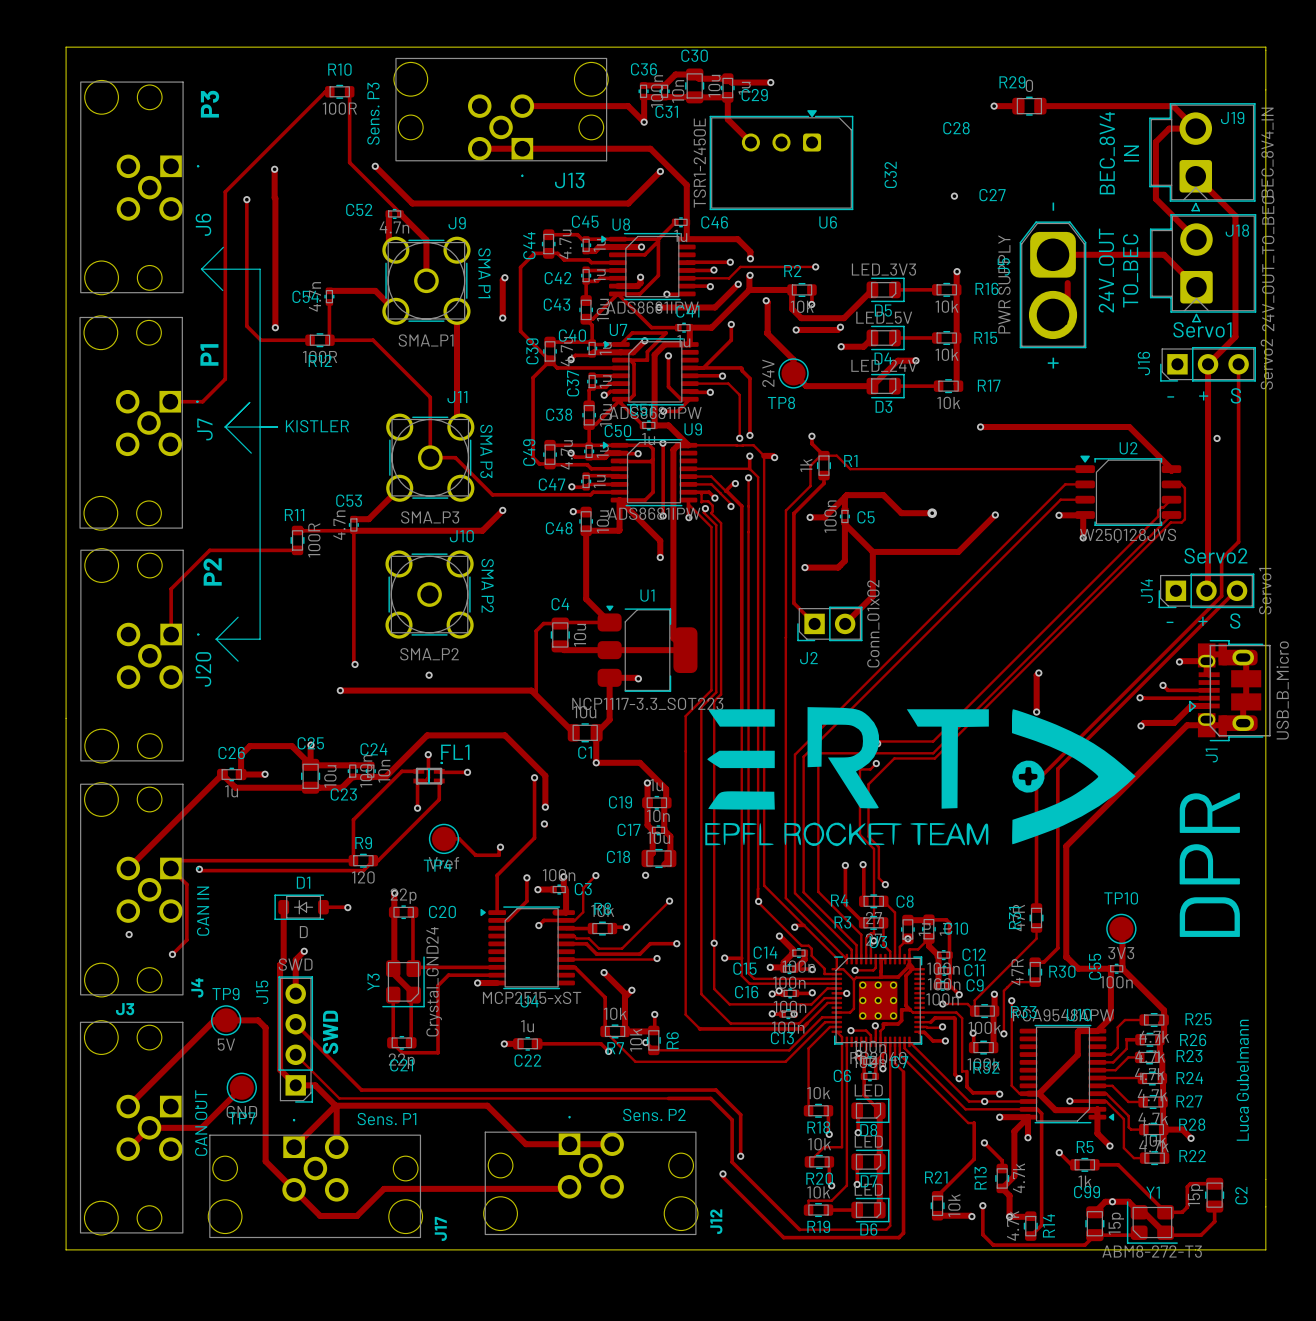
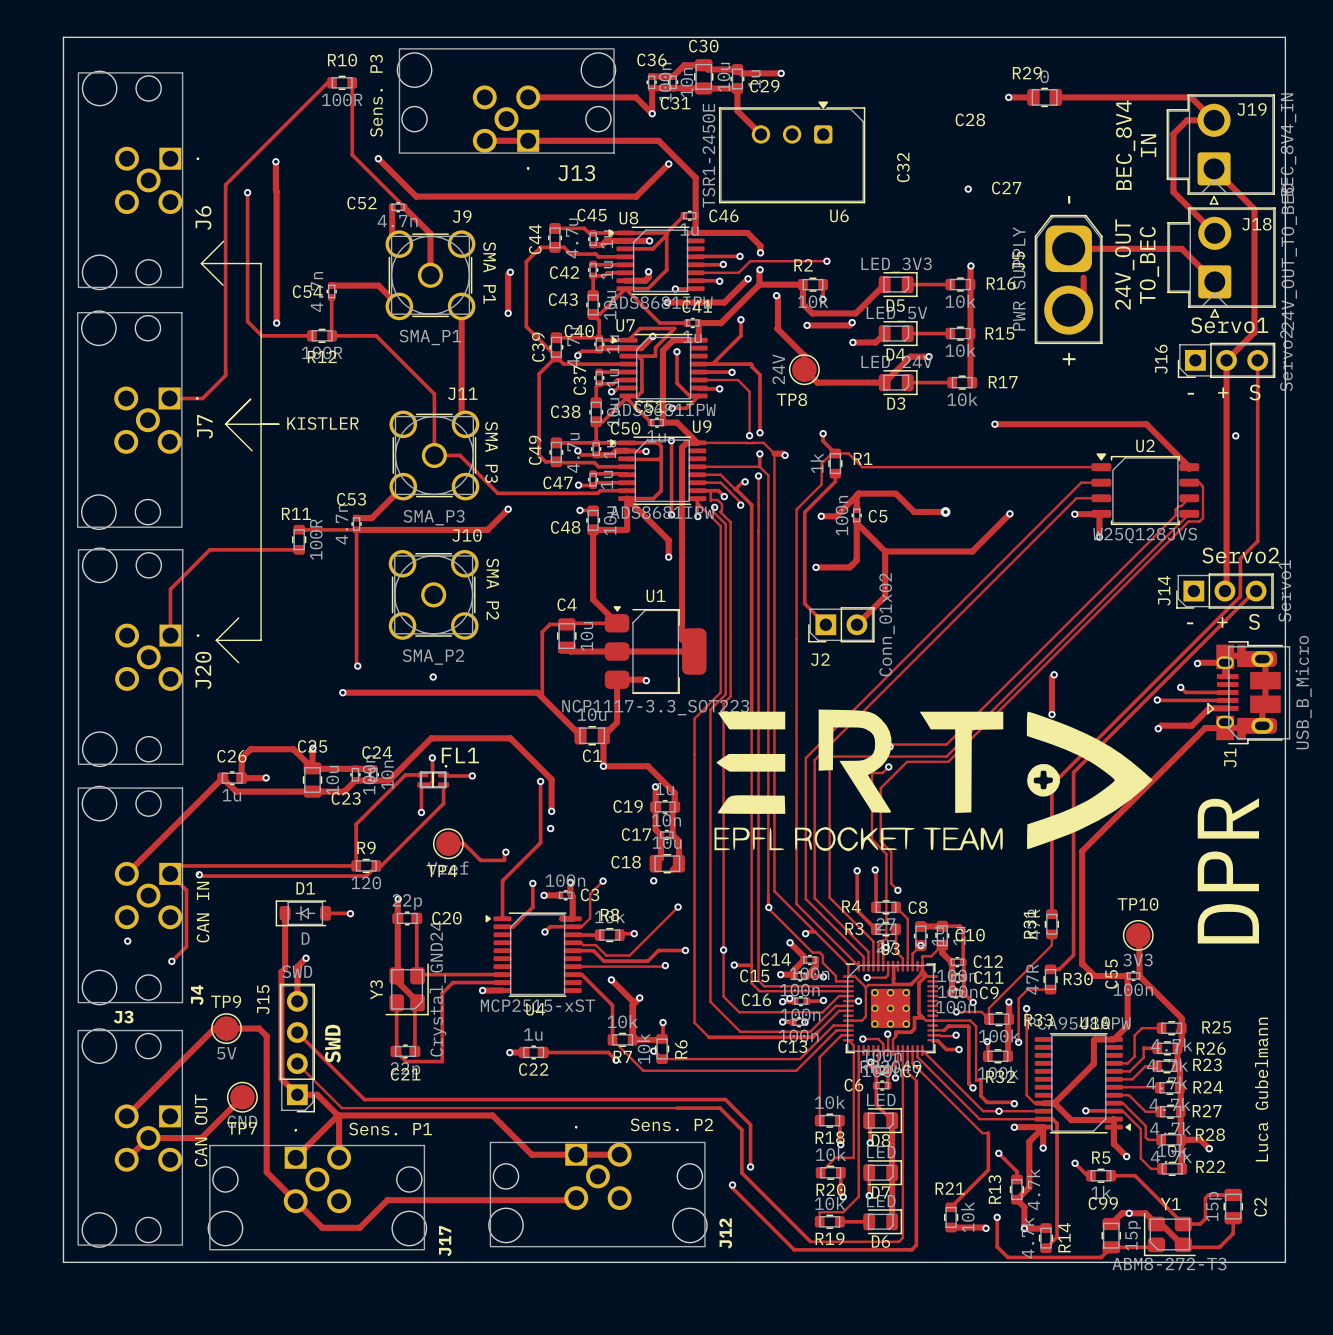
text: P3 (210, 104) -> none
text: P1 (209, 354) -> none
text: P2 (212, 571) -> none

